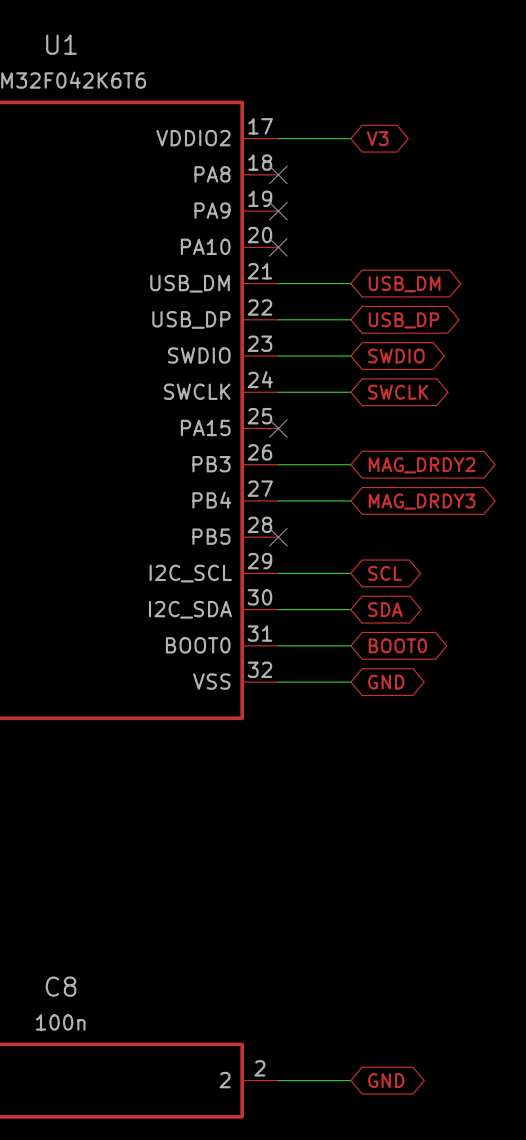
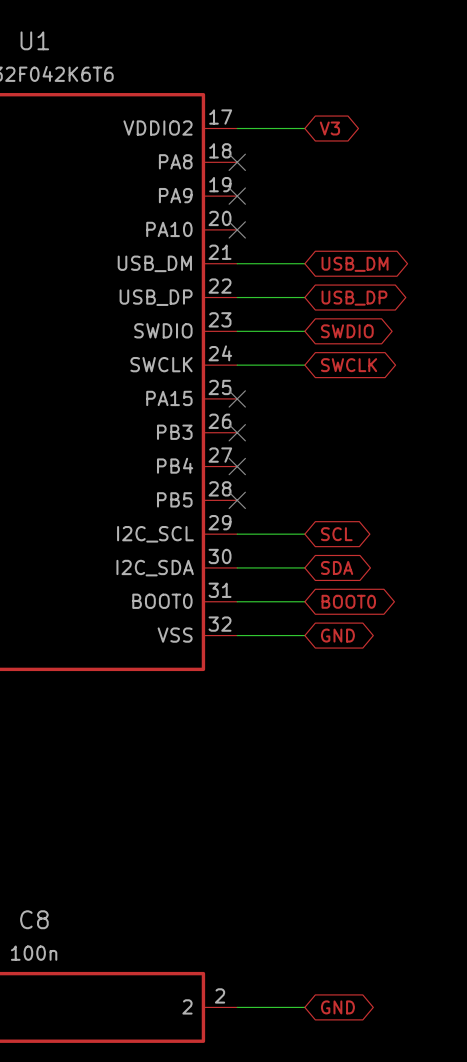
wire: (278, 464) (350, 464) -> none
no-connect mark: none -> (237, 432)
global label: MAG_DRDY2 (422, 465) -> none
wire: (278, 500) (350, 500) -> none
no-connect mark: none -> (237, 466)
global label: MAG_DRDY3 (422, 501) -> none

